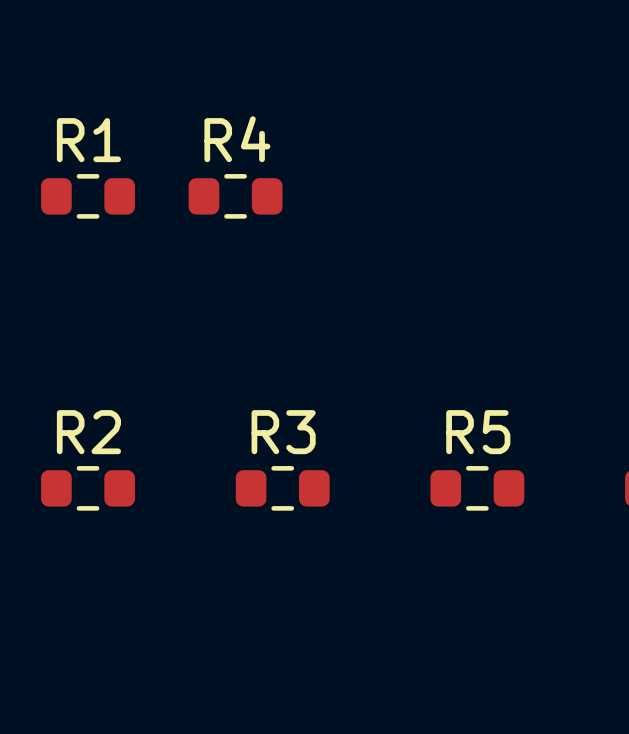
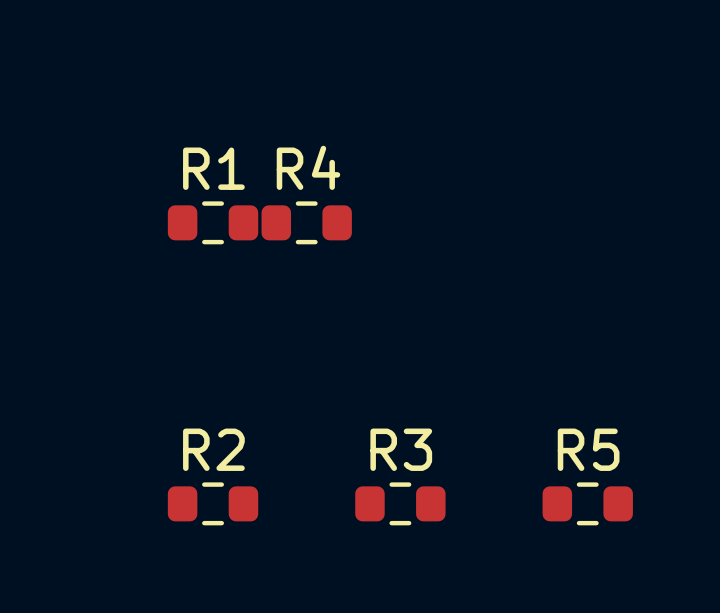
R4 position: (235, 196) -> (306, 222)

